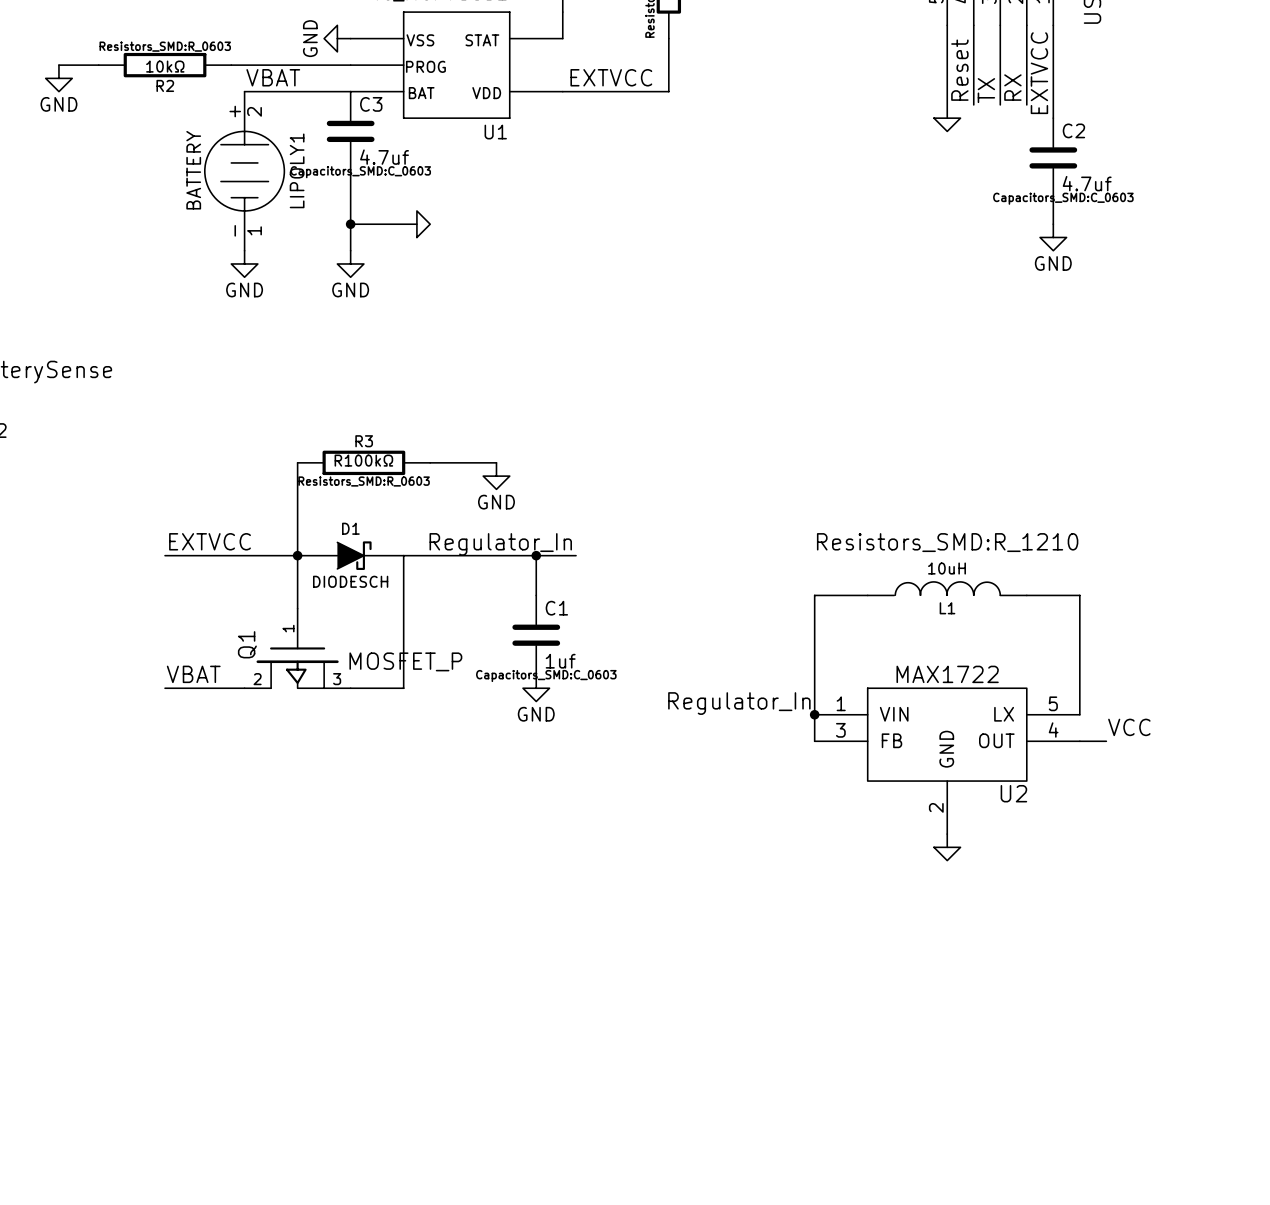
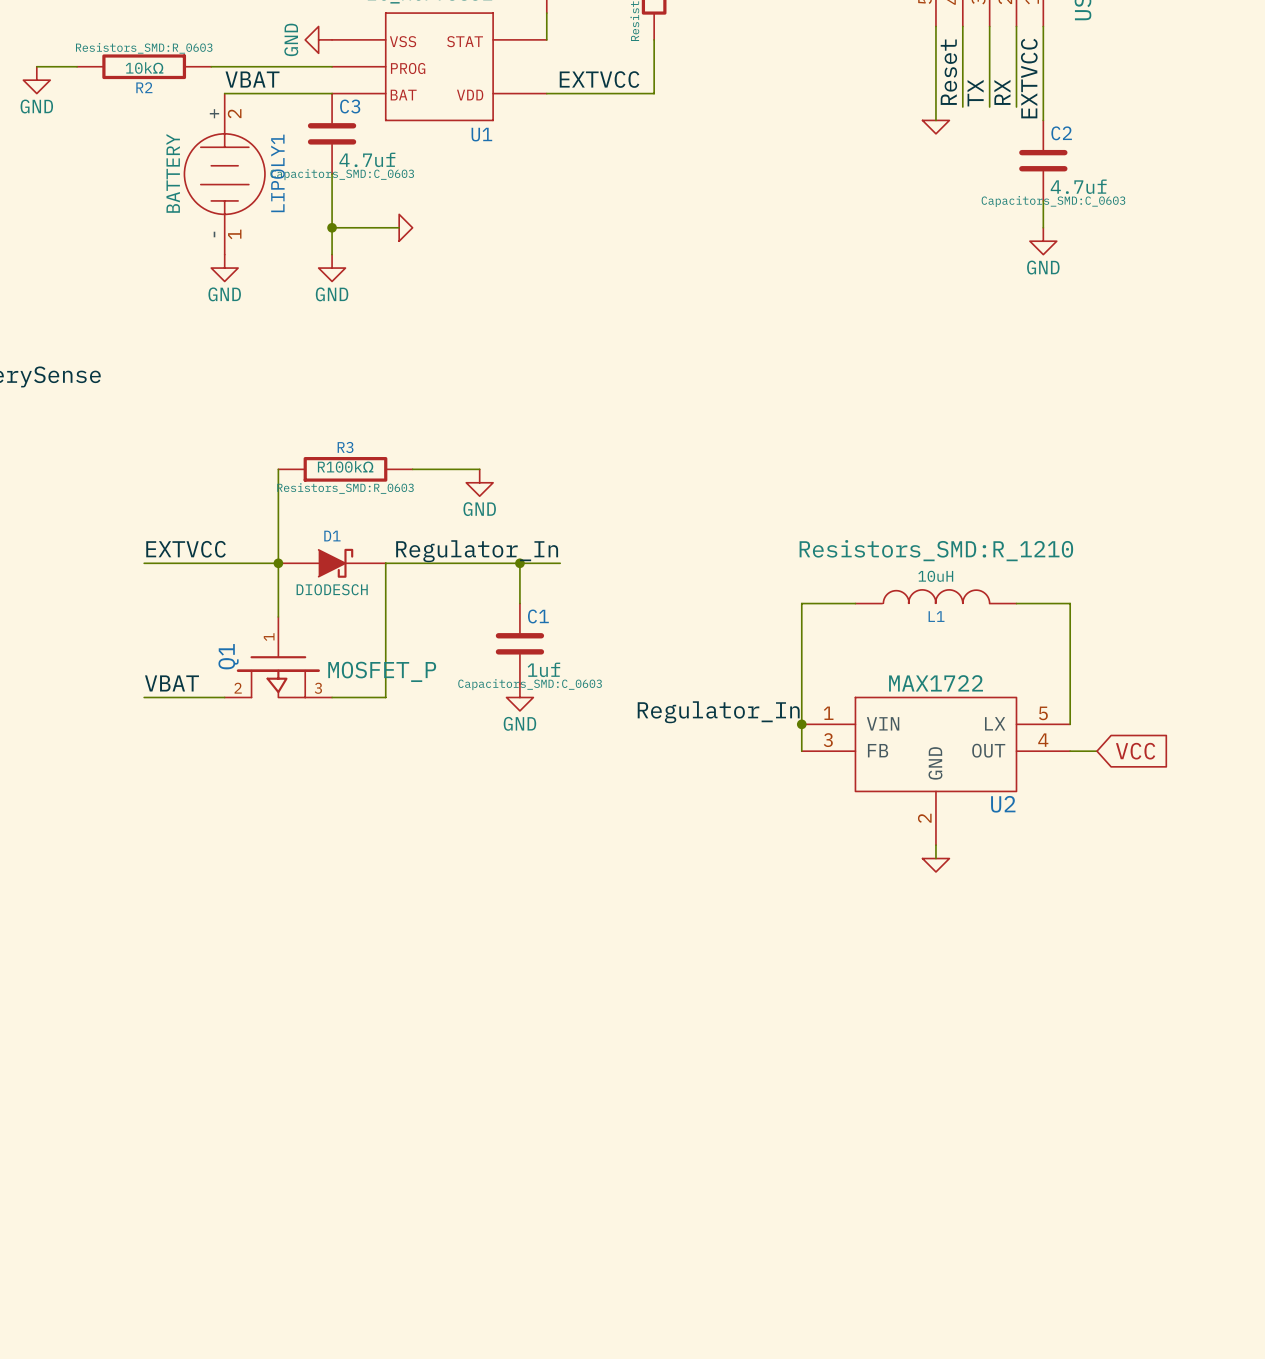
label: VCC (1129, 727) -> none
global label: none -> VCC (1135, 751)

